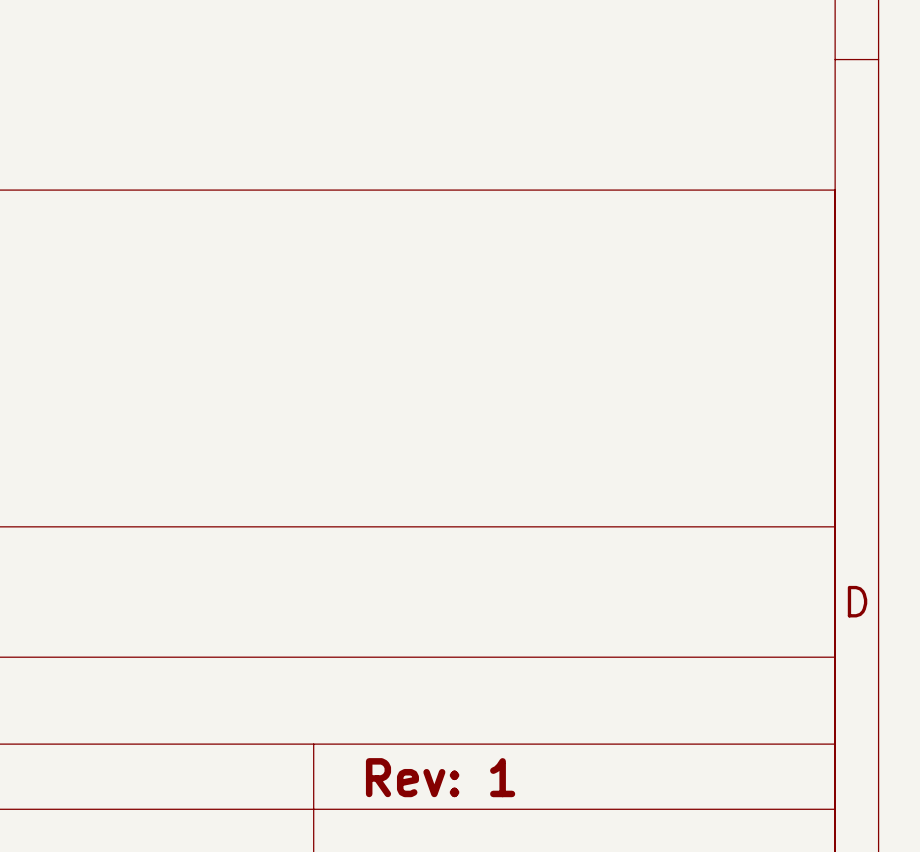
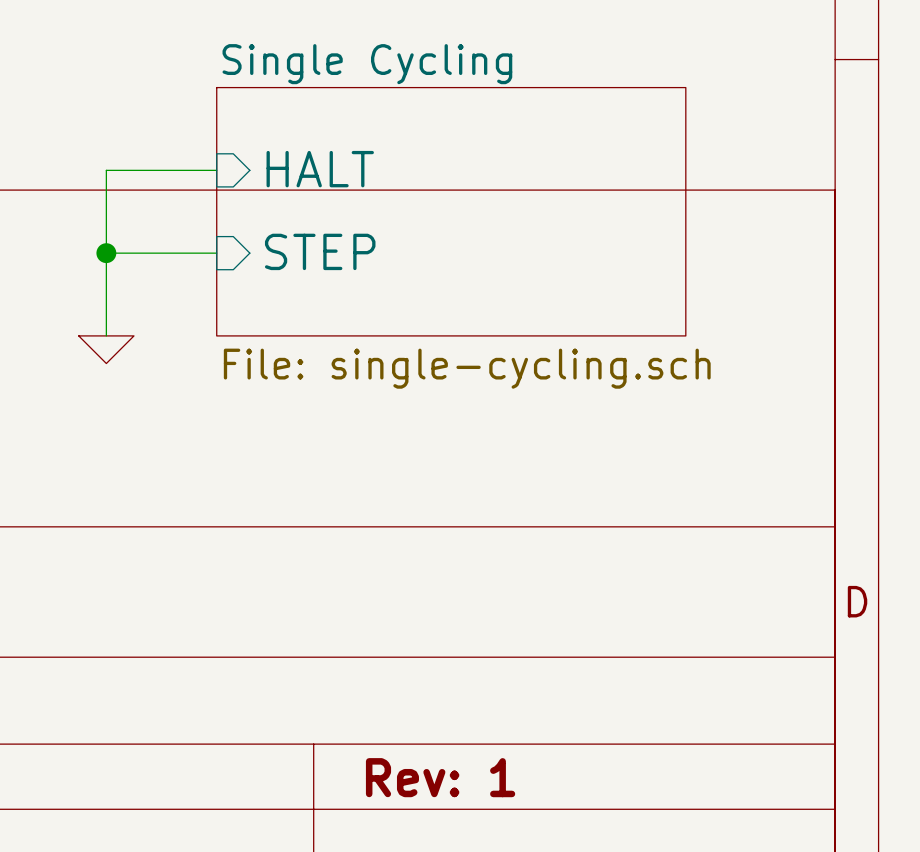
sheet pin: none -> HALT (320, 169)
wire: none -> (216, 170) (106, 170) (106, 335)
sheet Single Cycling: none -> File: single-cycling.sch (451, 211)
sheet pin: none -> STEP (320, 251)
wire: none -> (106, 253) (216, 253)
junction: none -> (106, 253)
power symbol: none -> (106, 349)

